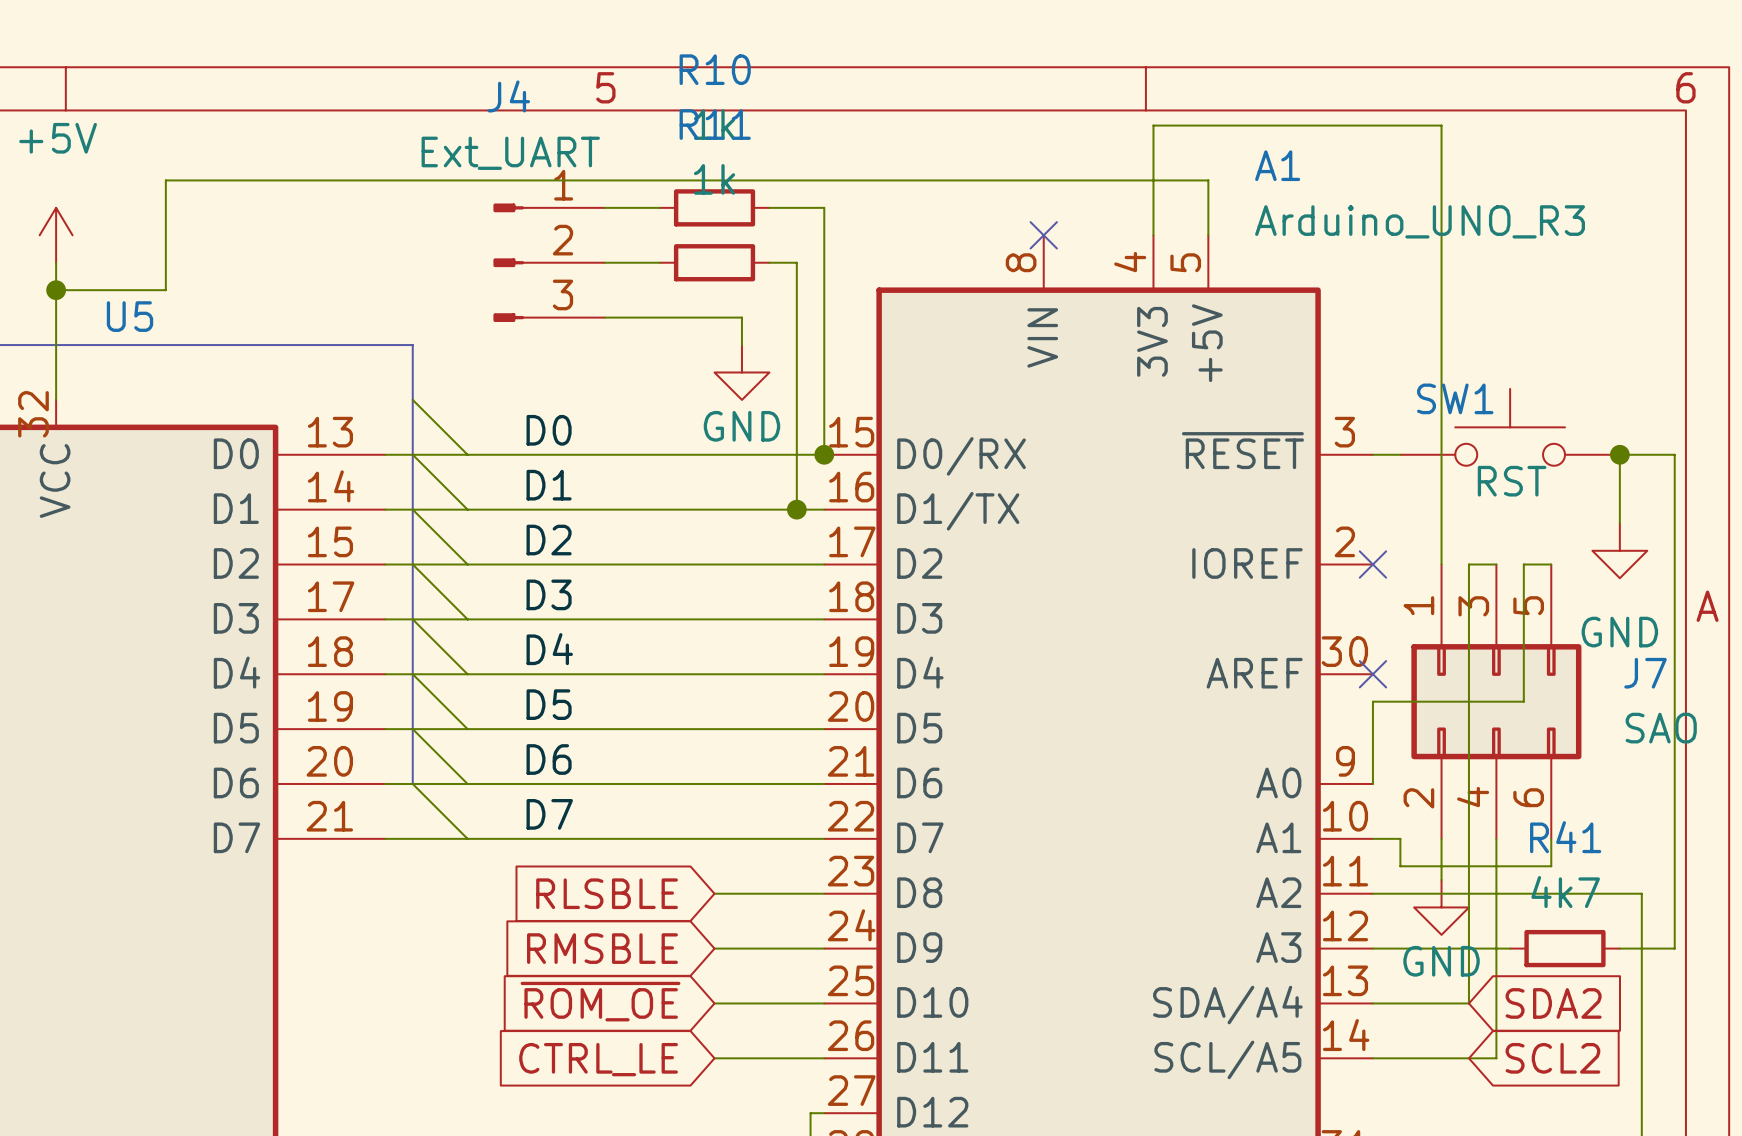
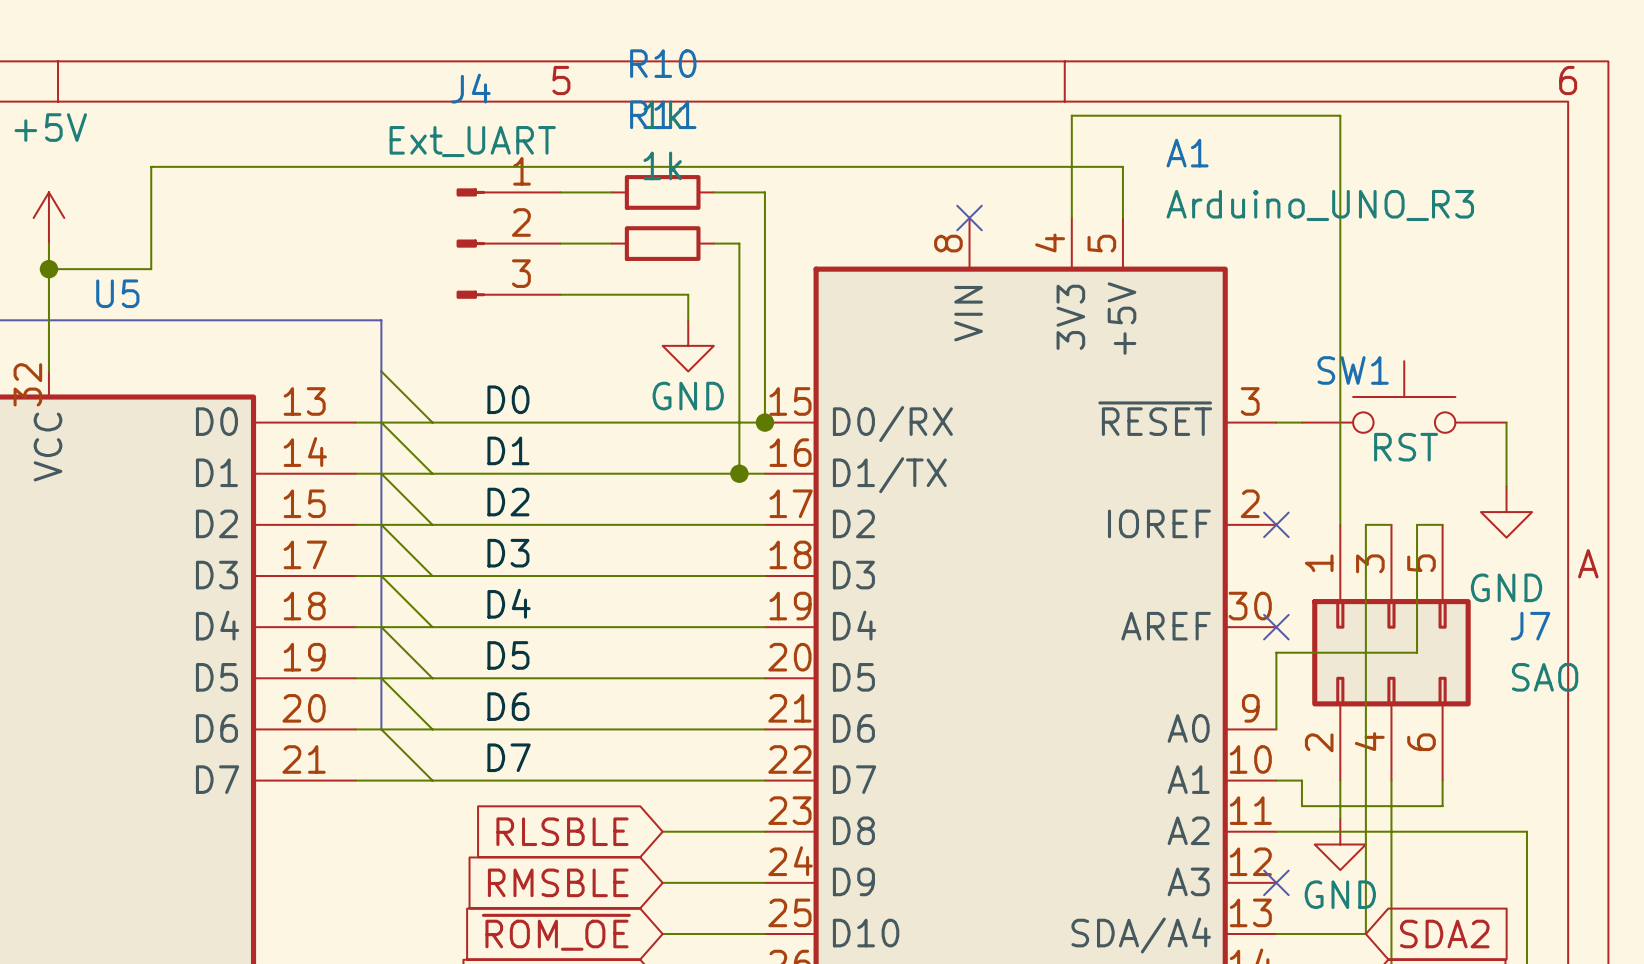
wire: (1619, 454) (1674, 454) (1674, 948) (1619, 948) -> none
junction: (1619, 454) -> none
wire: (1372, 948) (1510, 948) -> none
no-connect mark: none -> (1276, 882)
R41: 4k7 (1564, 948) -> none

